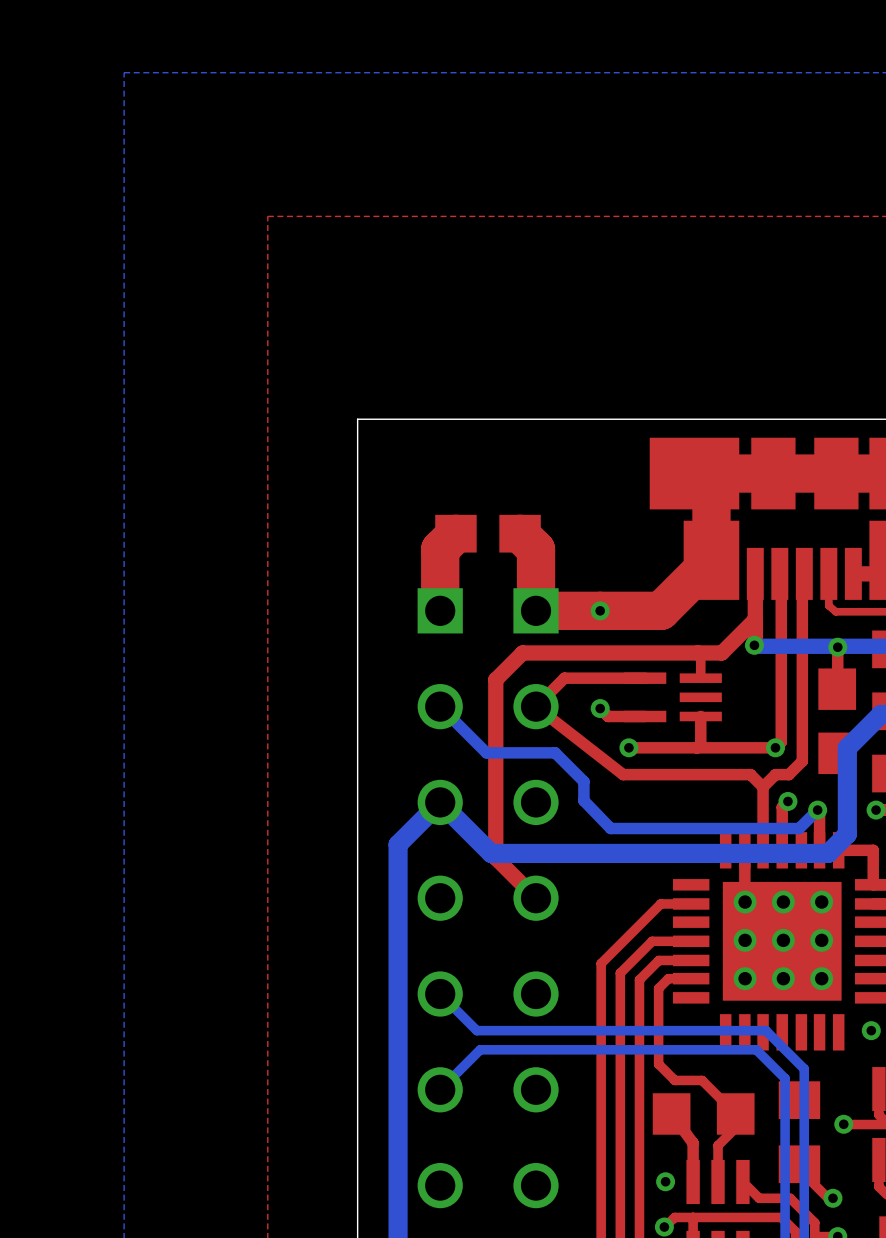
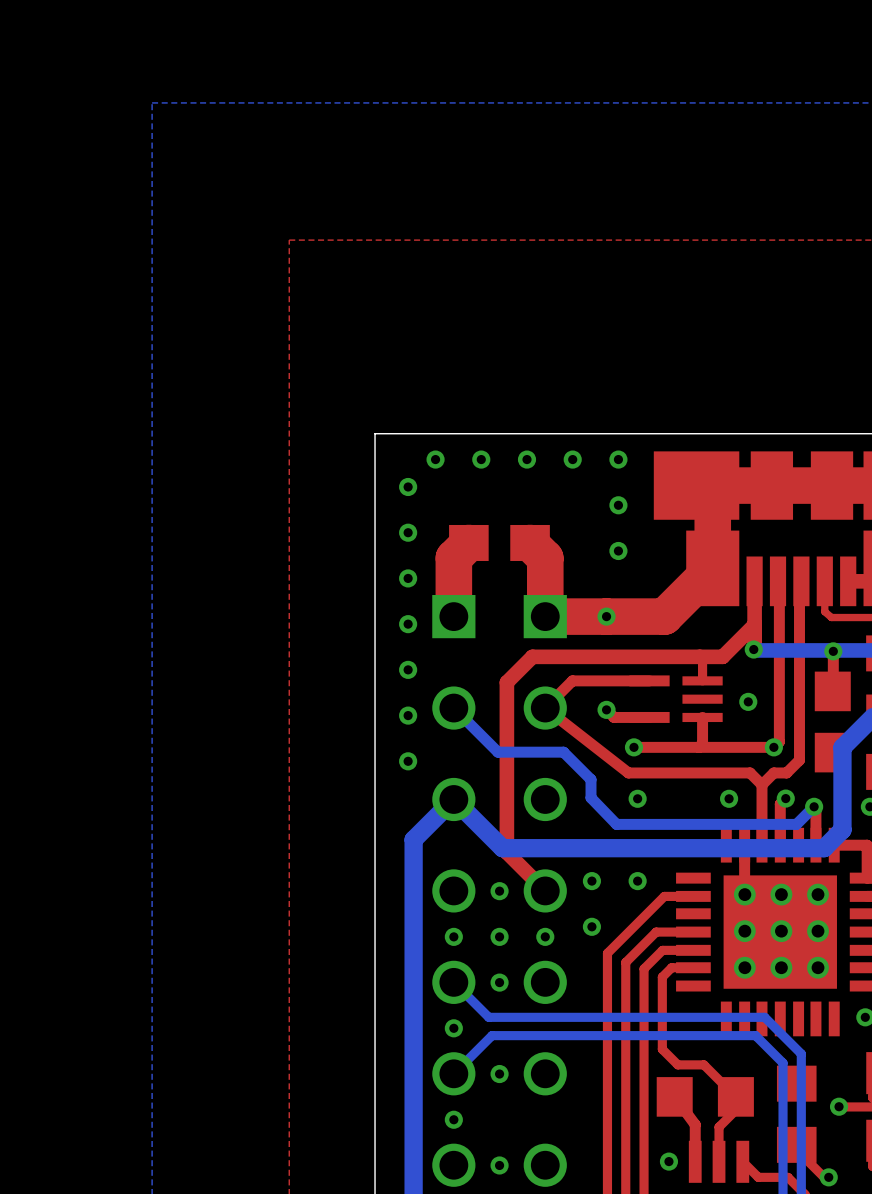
via: none -> (435, 459)
via: none -> (481, 459)
via: none -> (527, 459)
via: none -> (572, 459)
via: none -> (618, 459)
via: none -> (408, 486)
via: none -> (618, 505)
via: none -> (408, 532)
via: none -> (618, 551)
via: none -> (408, 578)
via: none -> (408, 624)
via: none -> (408, 669)
via: none -> (748, 701)
via: none -> (408, 715)
via: none -> (408, 761)
via: none -> (637, 798)
via: none -> (729, 798)
via: none -> (591, 881)
via: none -> (637, 881)
via: none -> (499, 891)
via: none -> (591, 926)
via: none -> (453, 936)
via: none -> (499, 936)
via: none -> (545, 936)
via: none -> (499, 982)
via: none -> (453, 1028)
via: none -> (499, 1074)
via: none -> (453, 1119)
via: none -> (499, 1165)

